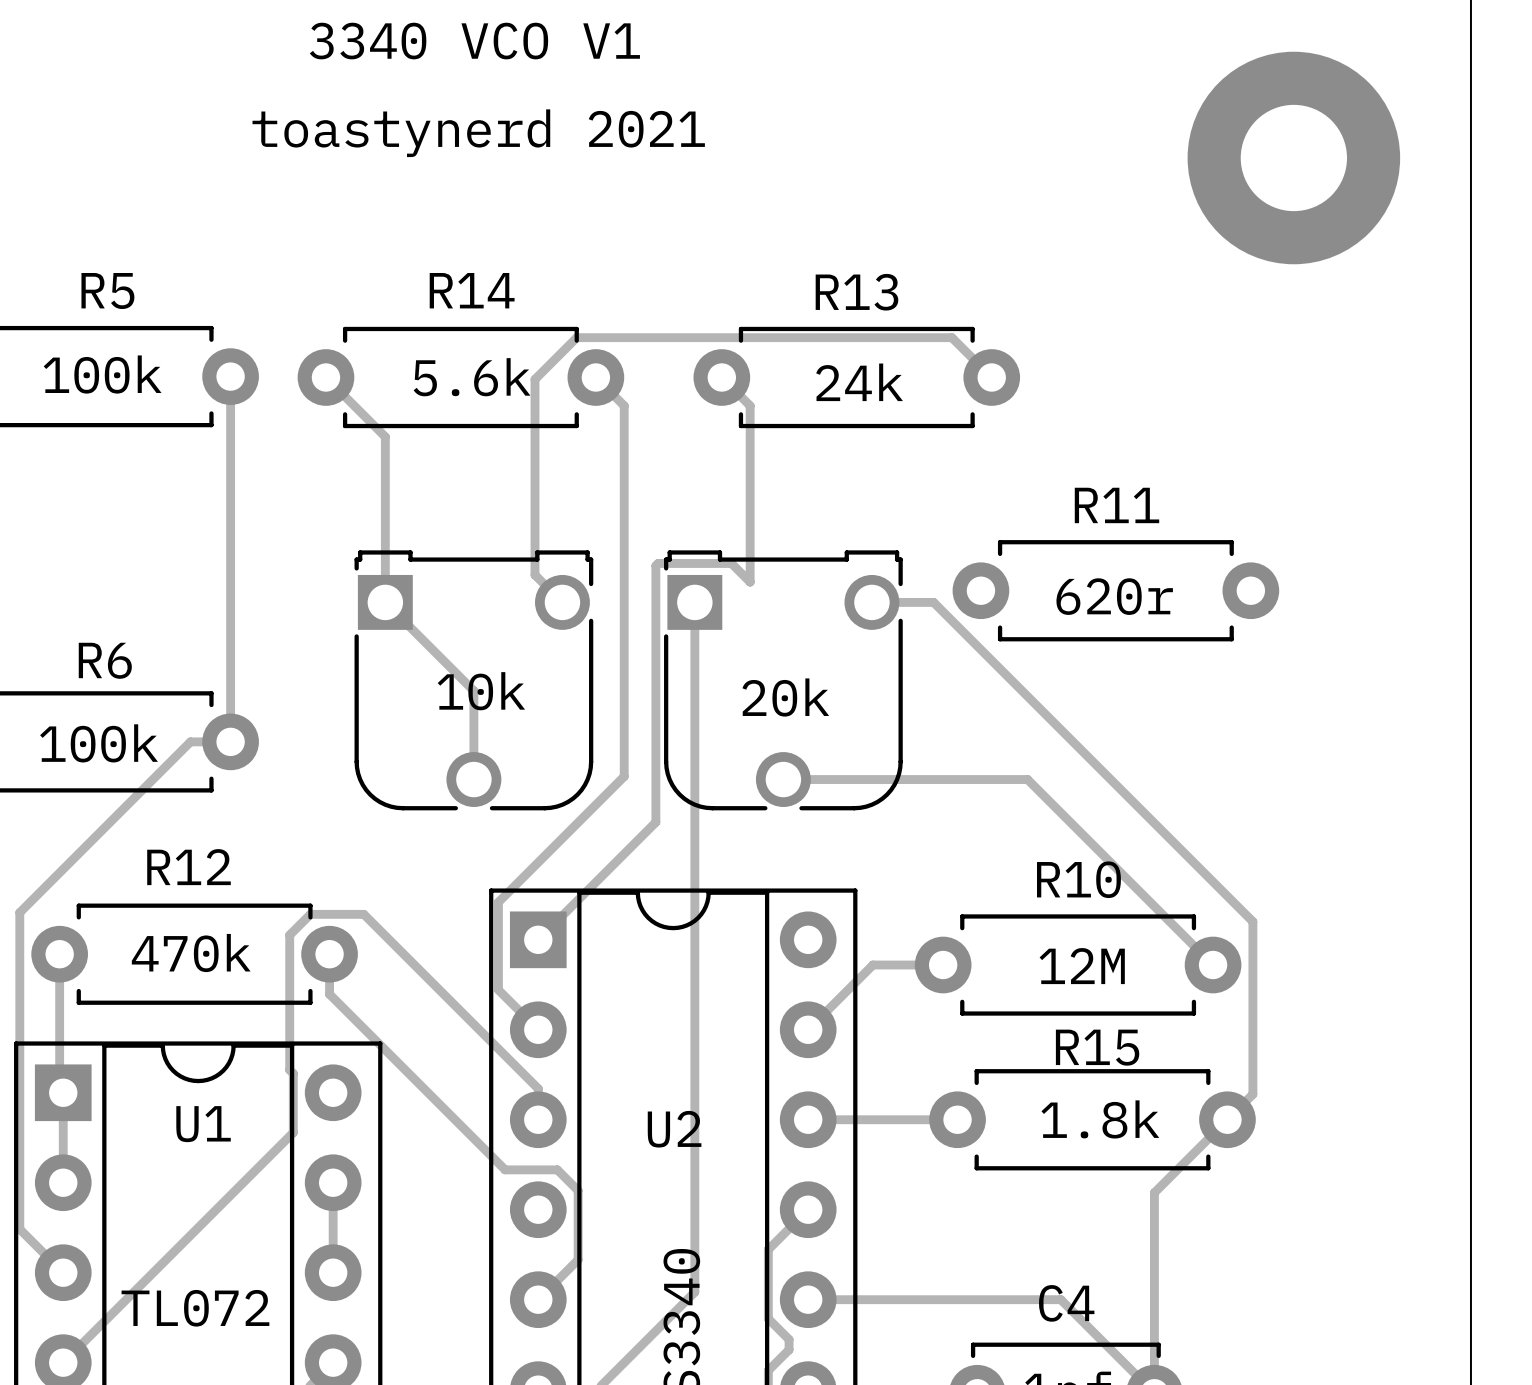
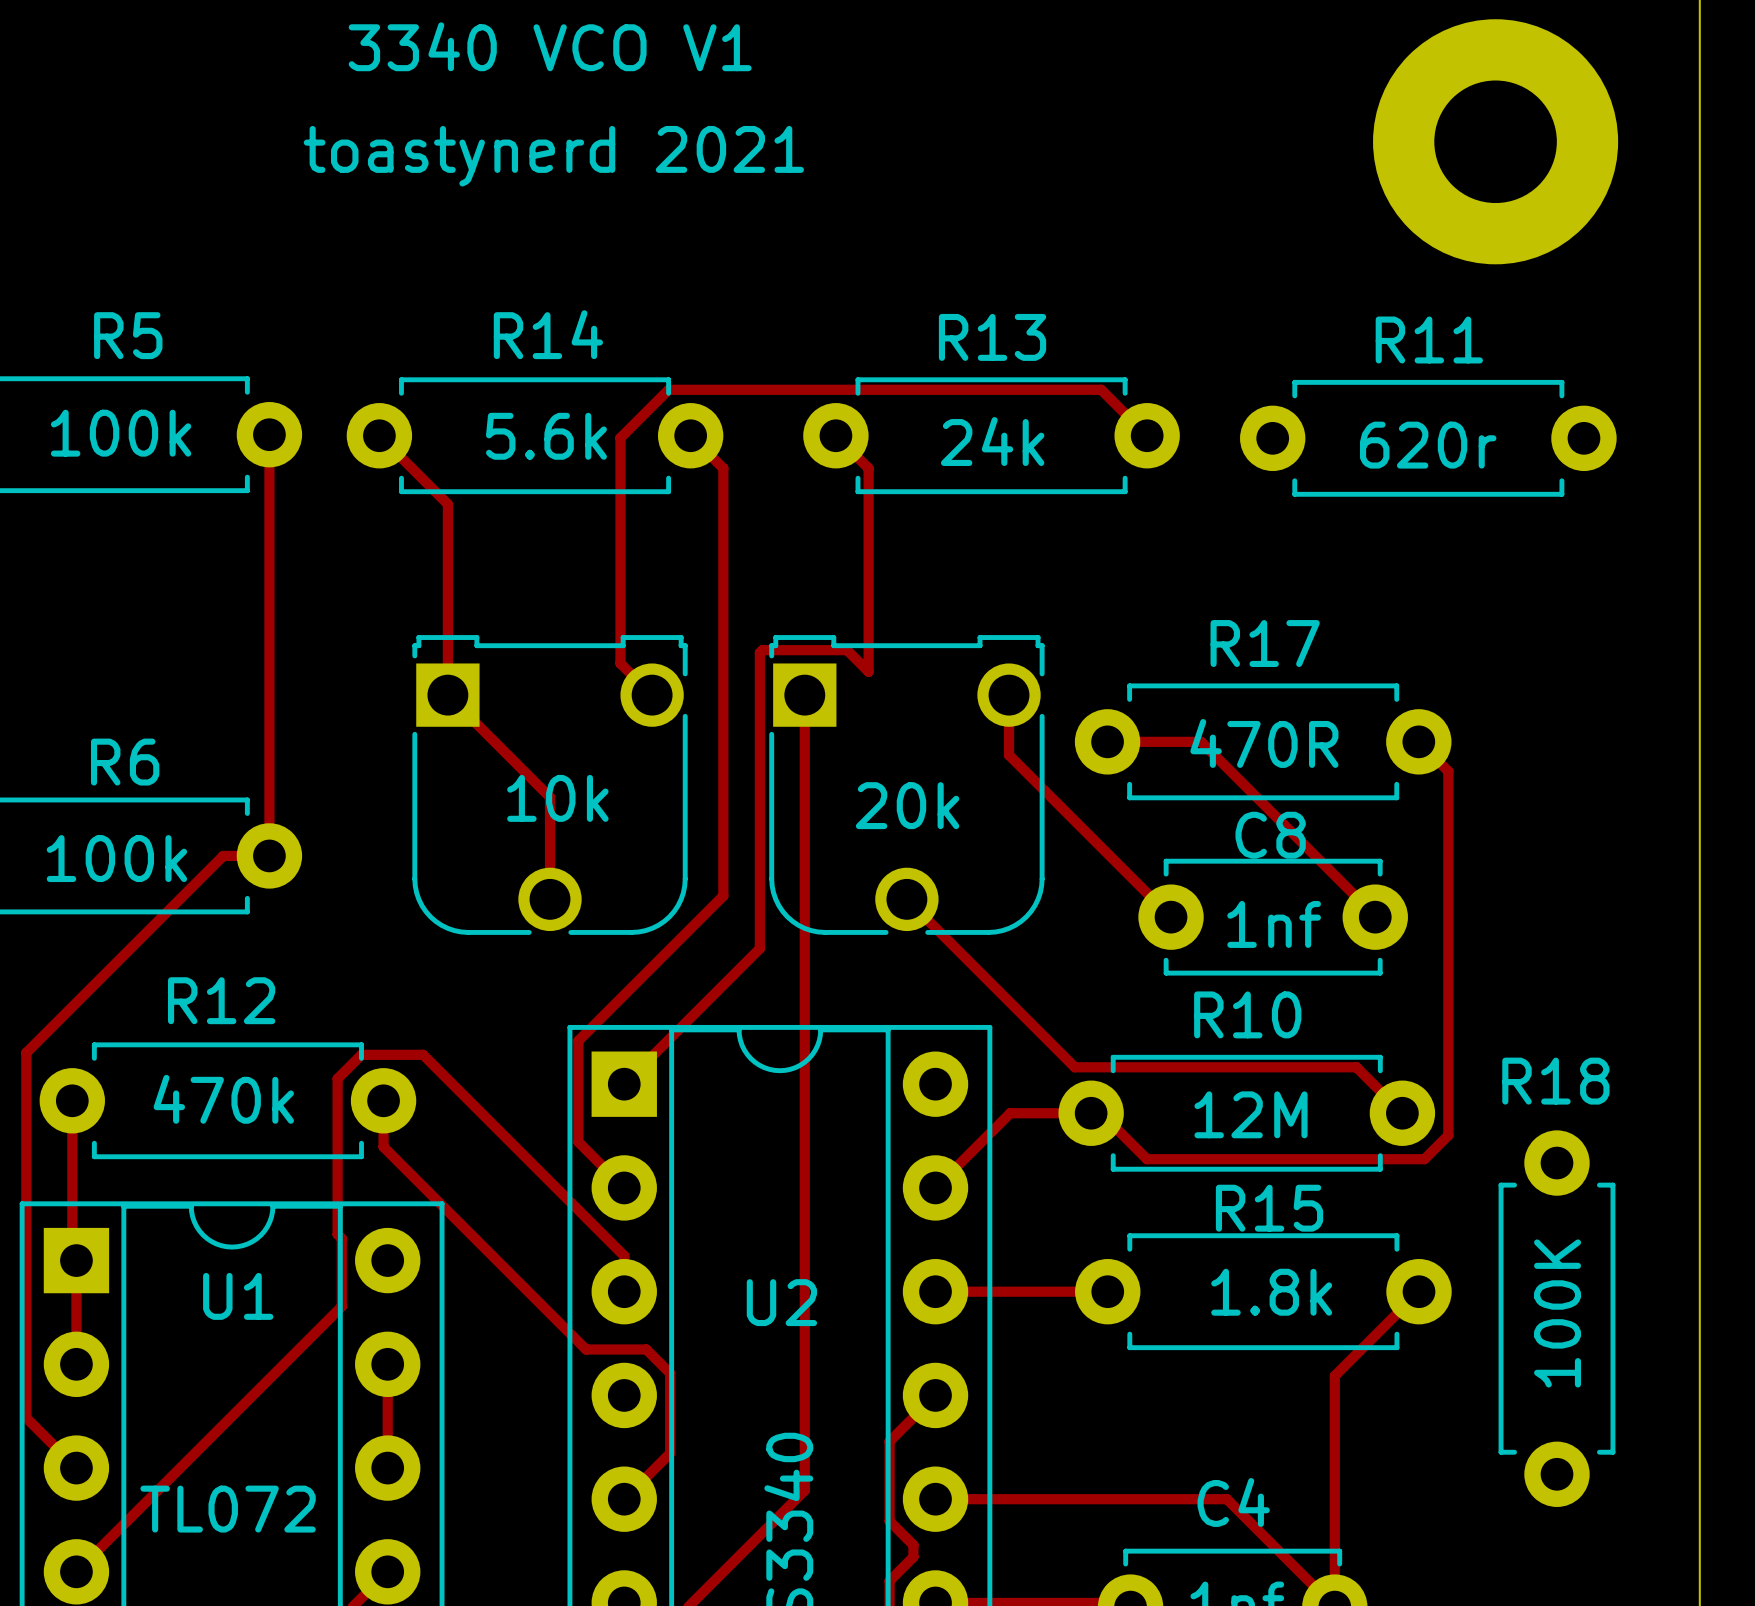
part position: (1293, 158) -> (1495, 141)
R11 position: (1115, 590) -> (1428, 438)
track: (871, 602) (933, 602) (1252, 921) -> (1009, 695) (1009, 755) (1171, 917)
track: none -> (1107, 741) (1201, 741) (1375, 917)
R17: none -> 470R (1263, 741)
track: none -> (1418, 741) (1448, 771) (1448, 1063)
track: (783, 779) (1027, 779) (1173, 925) -> (906, 899) (1074, 1067) (1356, 1067)
C8: none -> 1nf (1273, 917)
track: (1252, 984) (1252, 1094) (1227, 1119) -> (1448, 1135) (1424, 1159) (1146, 1159) (1101, 1113) (1091, 1113)
R18: none -> 100K (1556, 1318)

